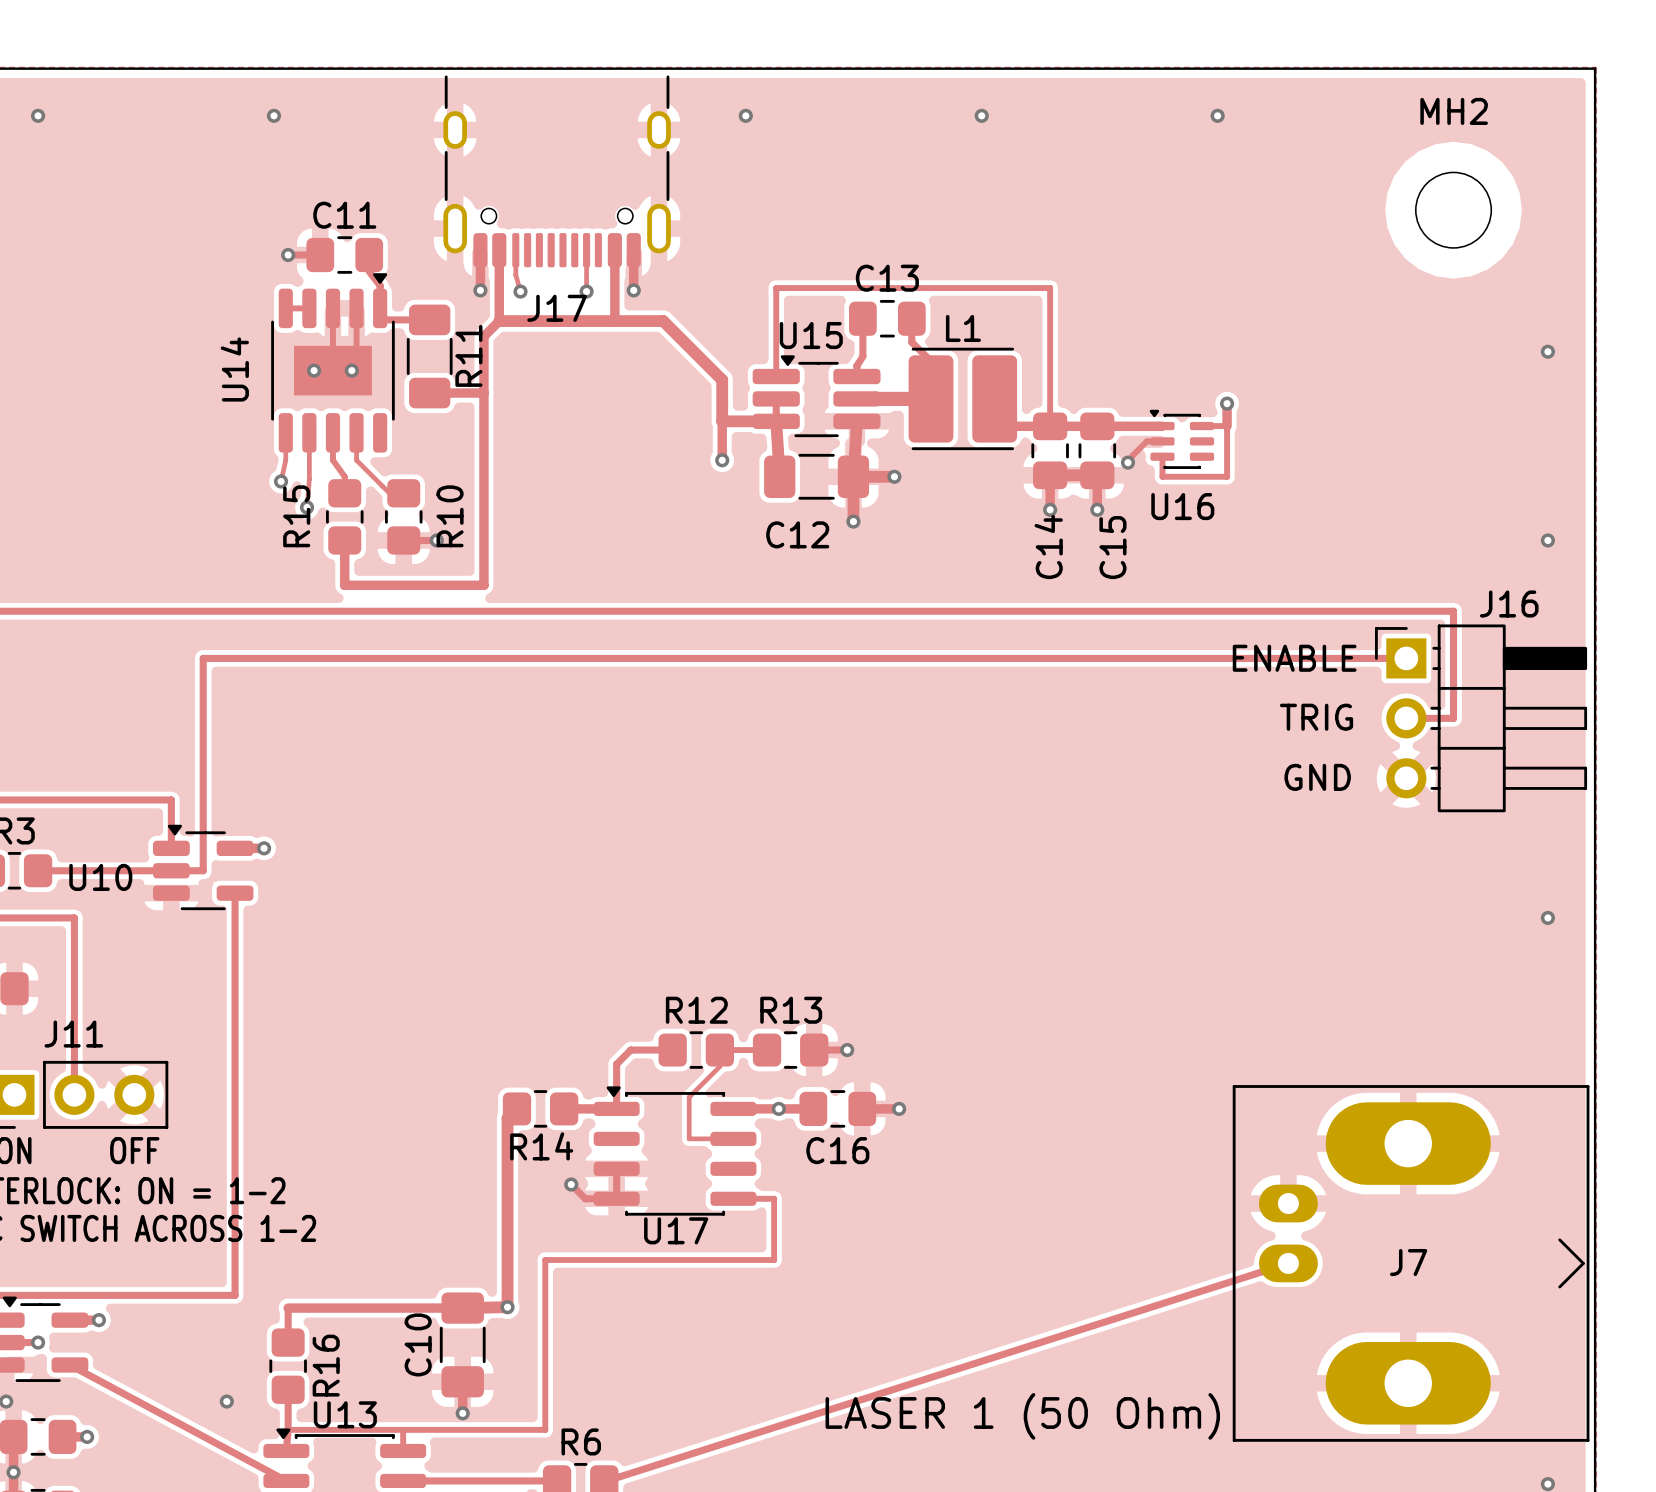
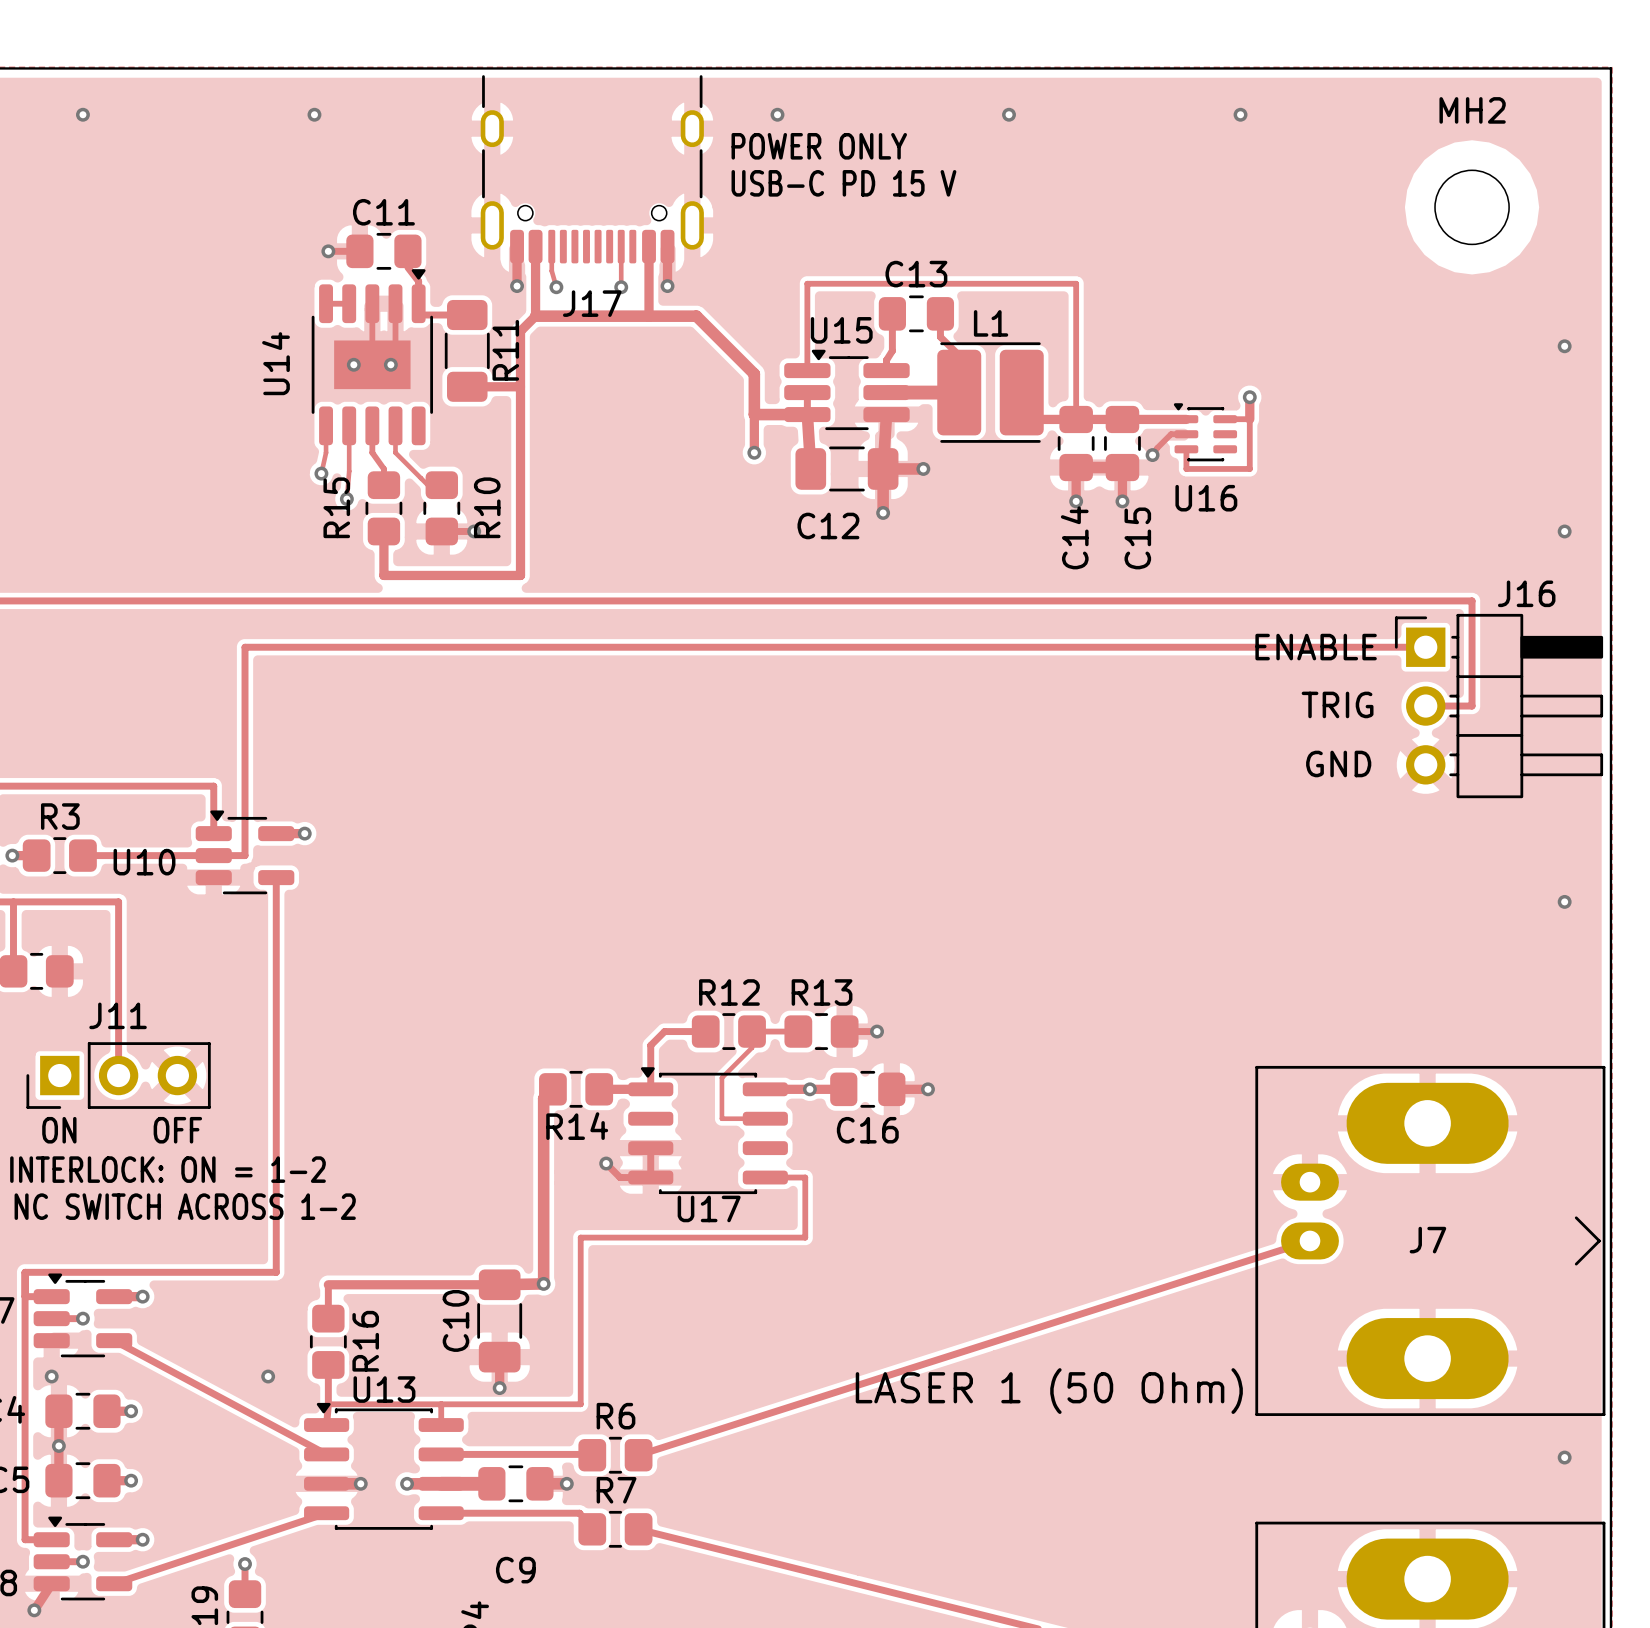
text: none -> POWER ONLY (819, 146)
text: none -> USB-C PD 15 V (843, 183)

